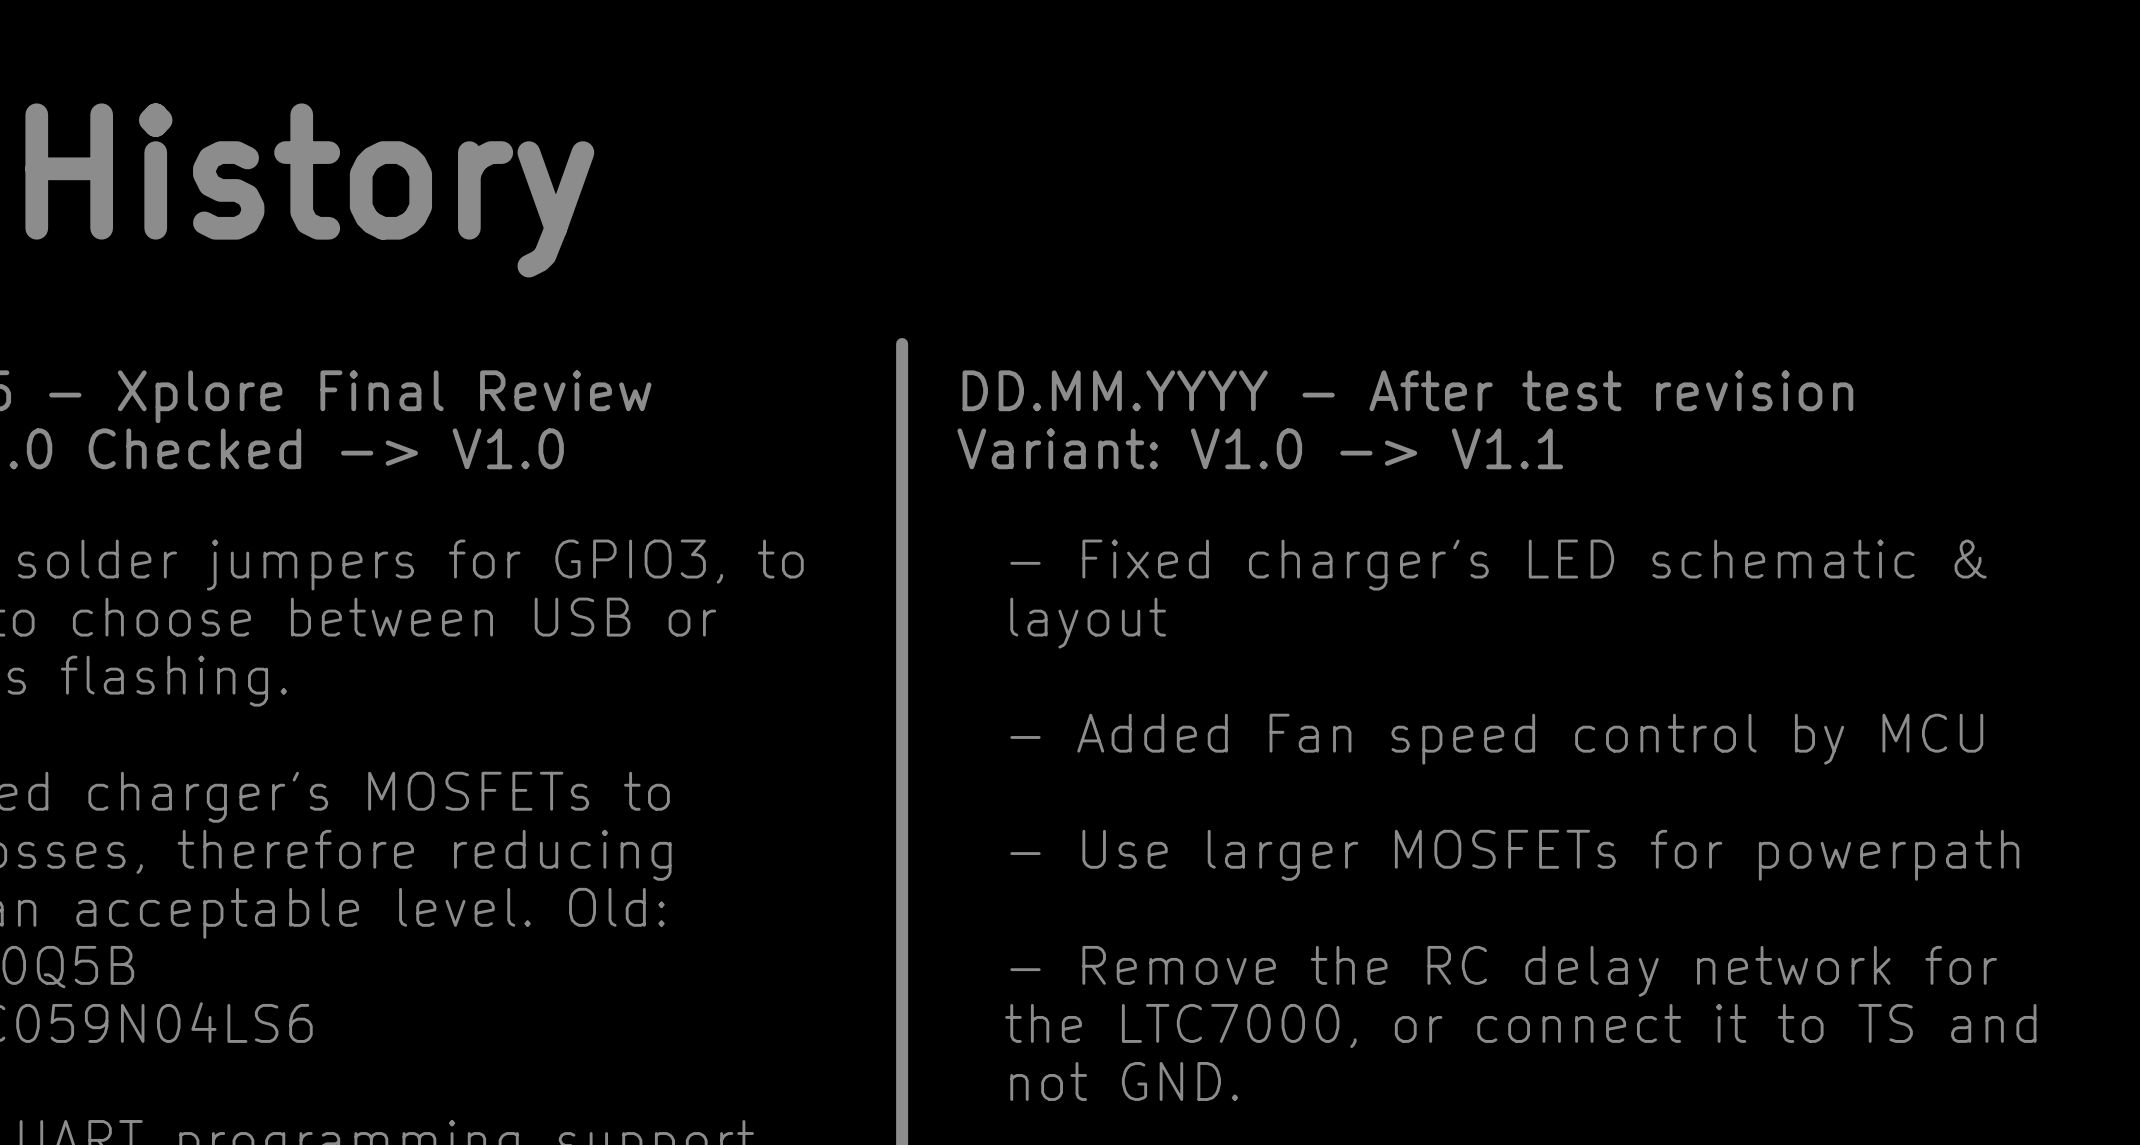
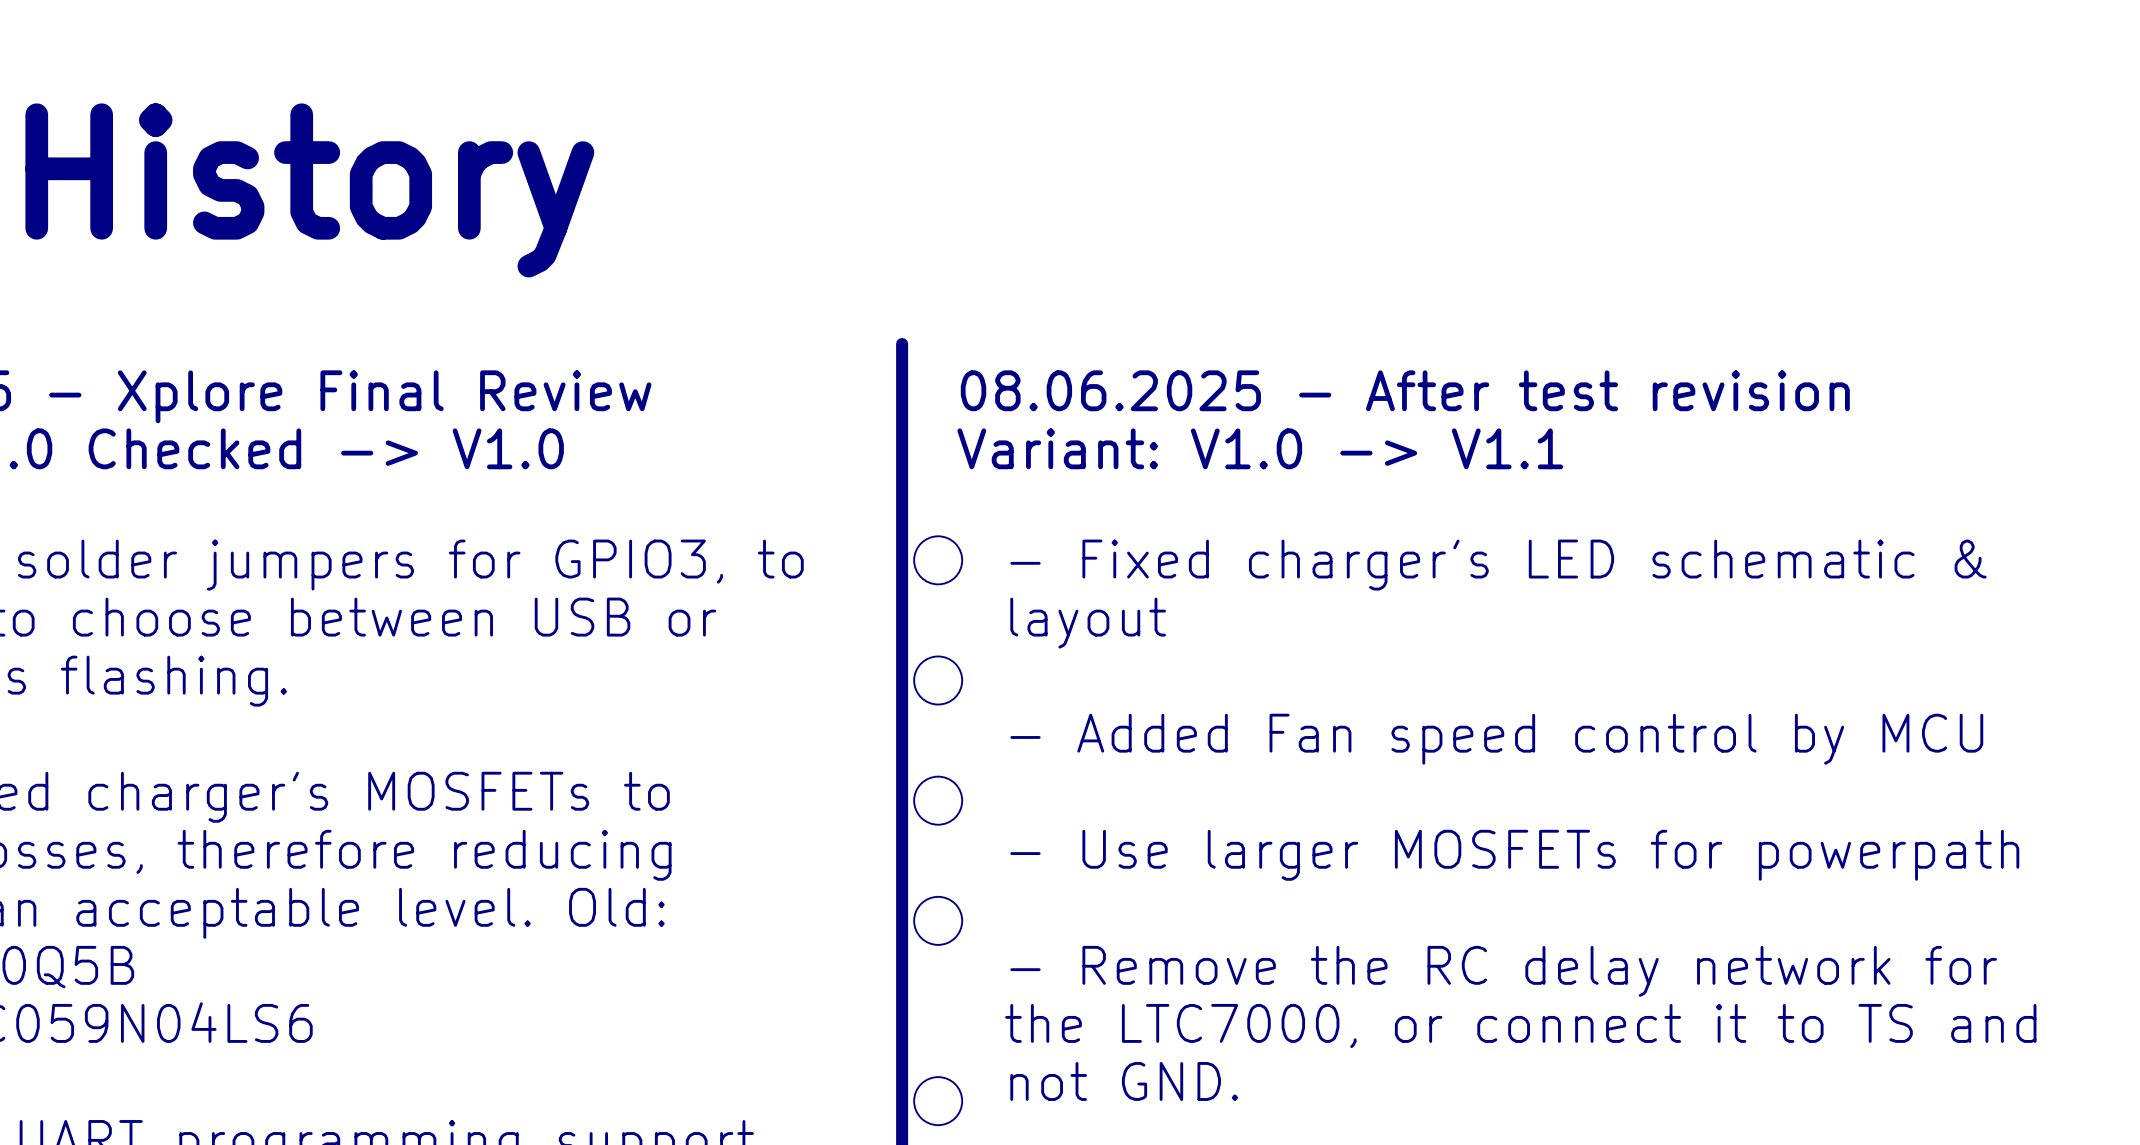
text: DD.MM.YYYY - After test revision (1407, 390) -> 08.06.2025 - After test revision (1405, 390)
drawing: none -> [914, 536, 963, 585]
drawing: none -> [914, 656, 963, 705]
drawing: none -> [914, 776, 963, 825]
drawing: none -> [914, 896, 963, 945]
drawing: none -> [914, 1077, 963, 1126]

